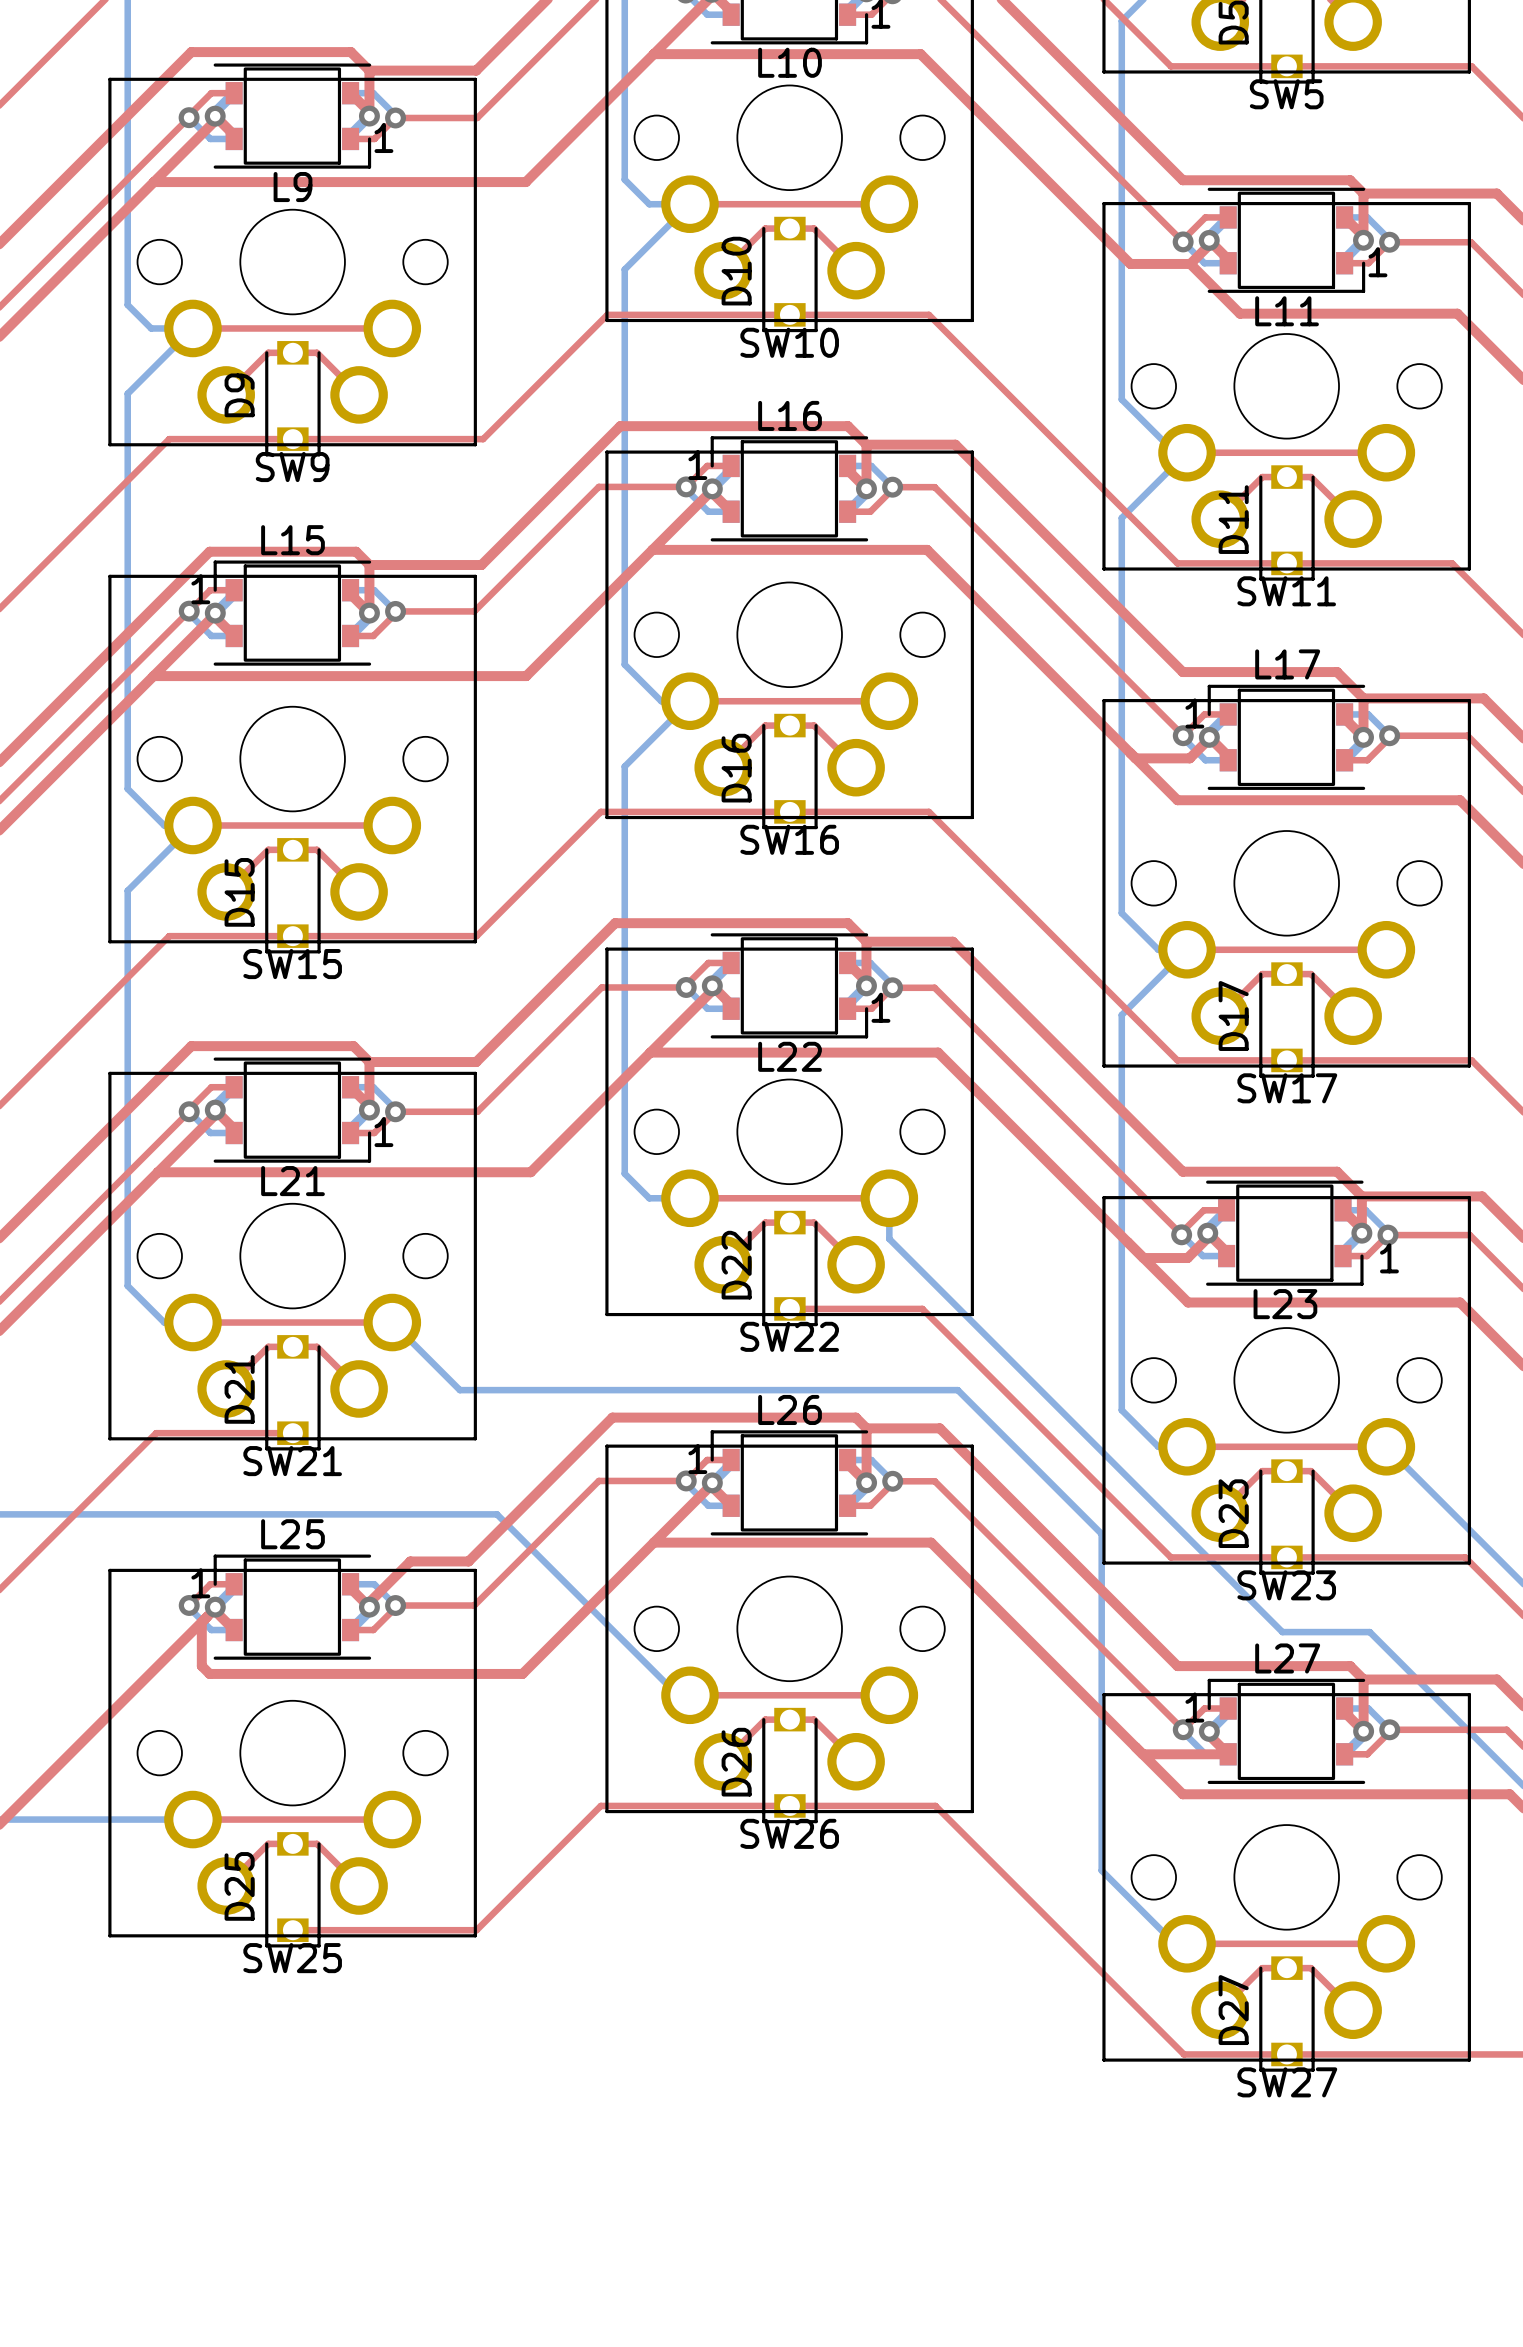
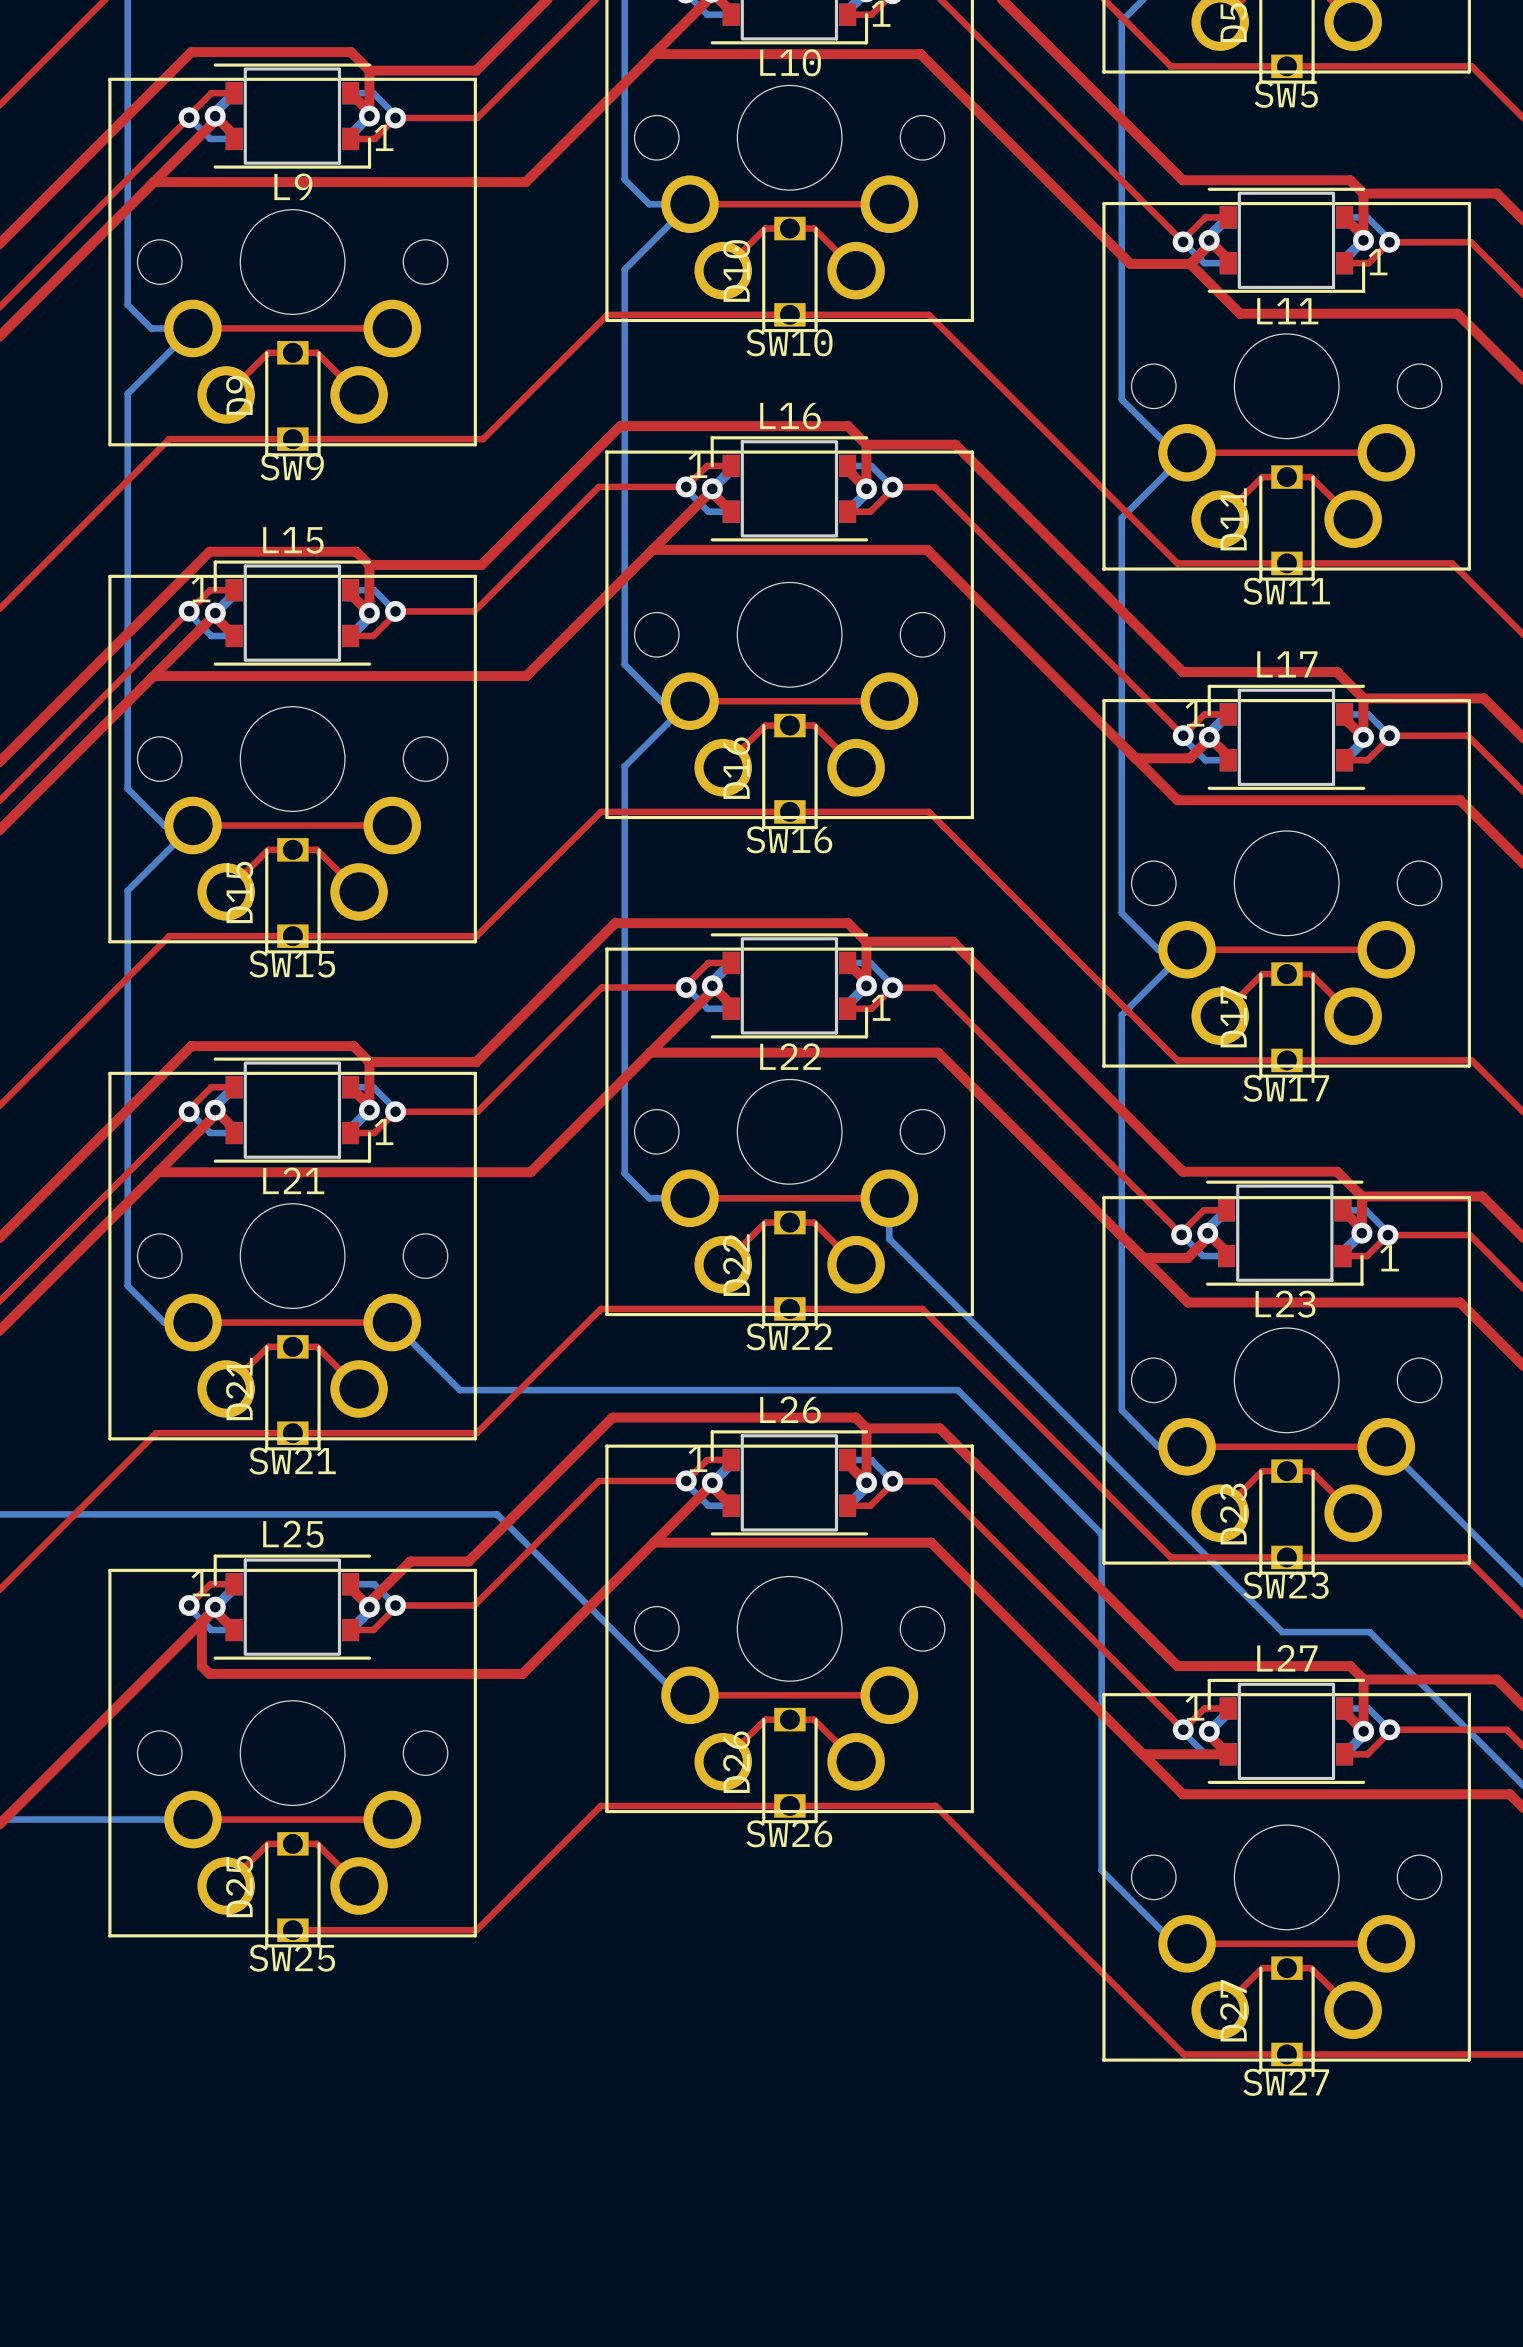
top track: none -> (789, 1308) (600, 1308) (476, 1433) (292, 1433)

